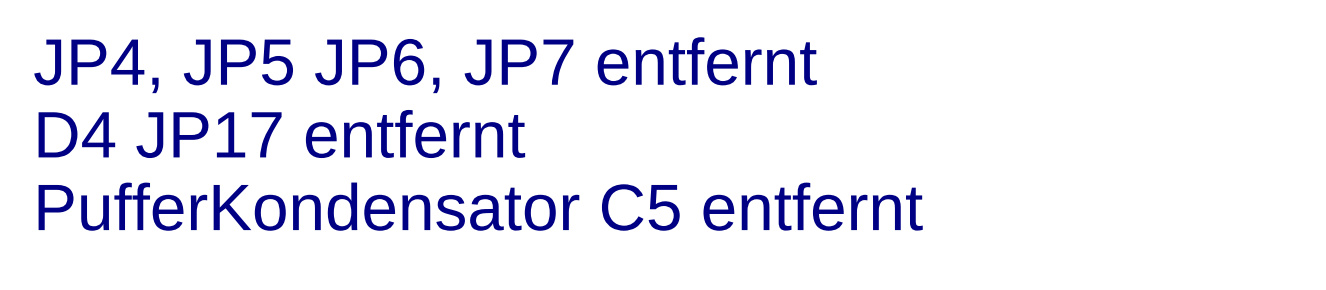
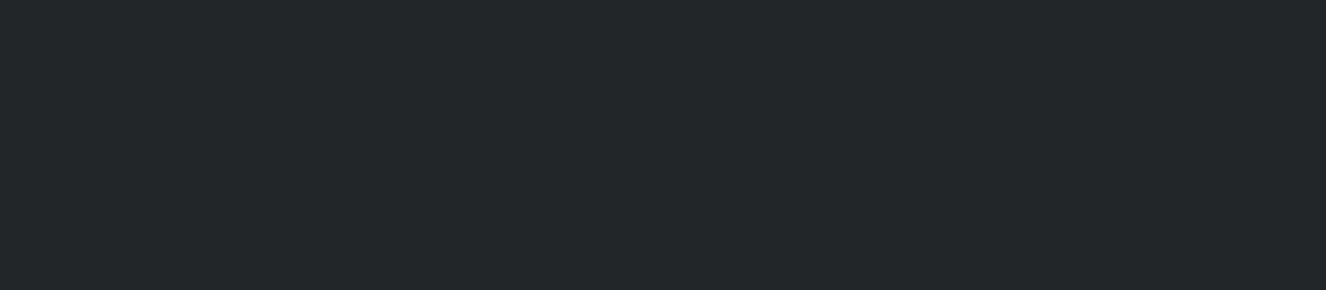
text: JP4, JP5 JP6, JP7 entfernt (425, 65) -> none
text: D4 JP17 entfernt (281, 134) -> none
text: PufferKondensator C5 entfernt (480, 206) -> none

